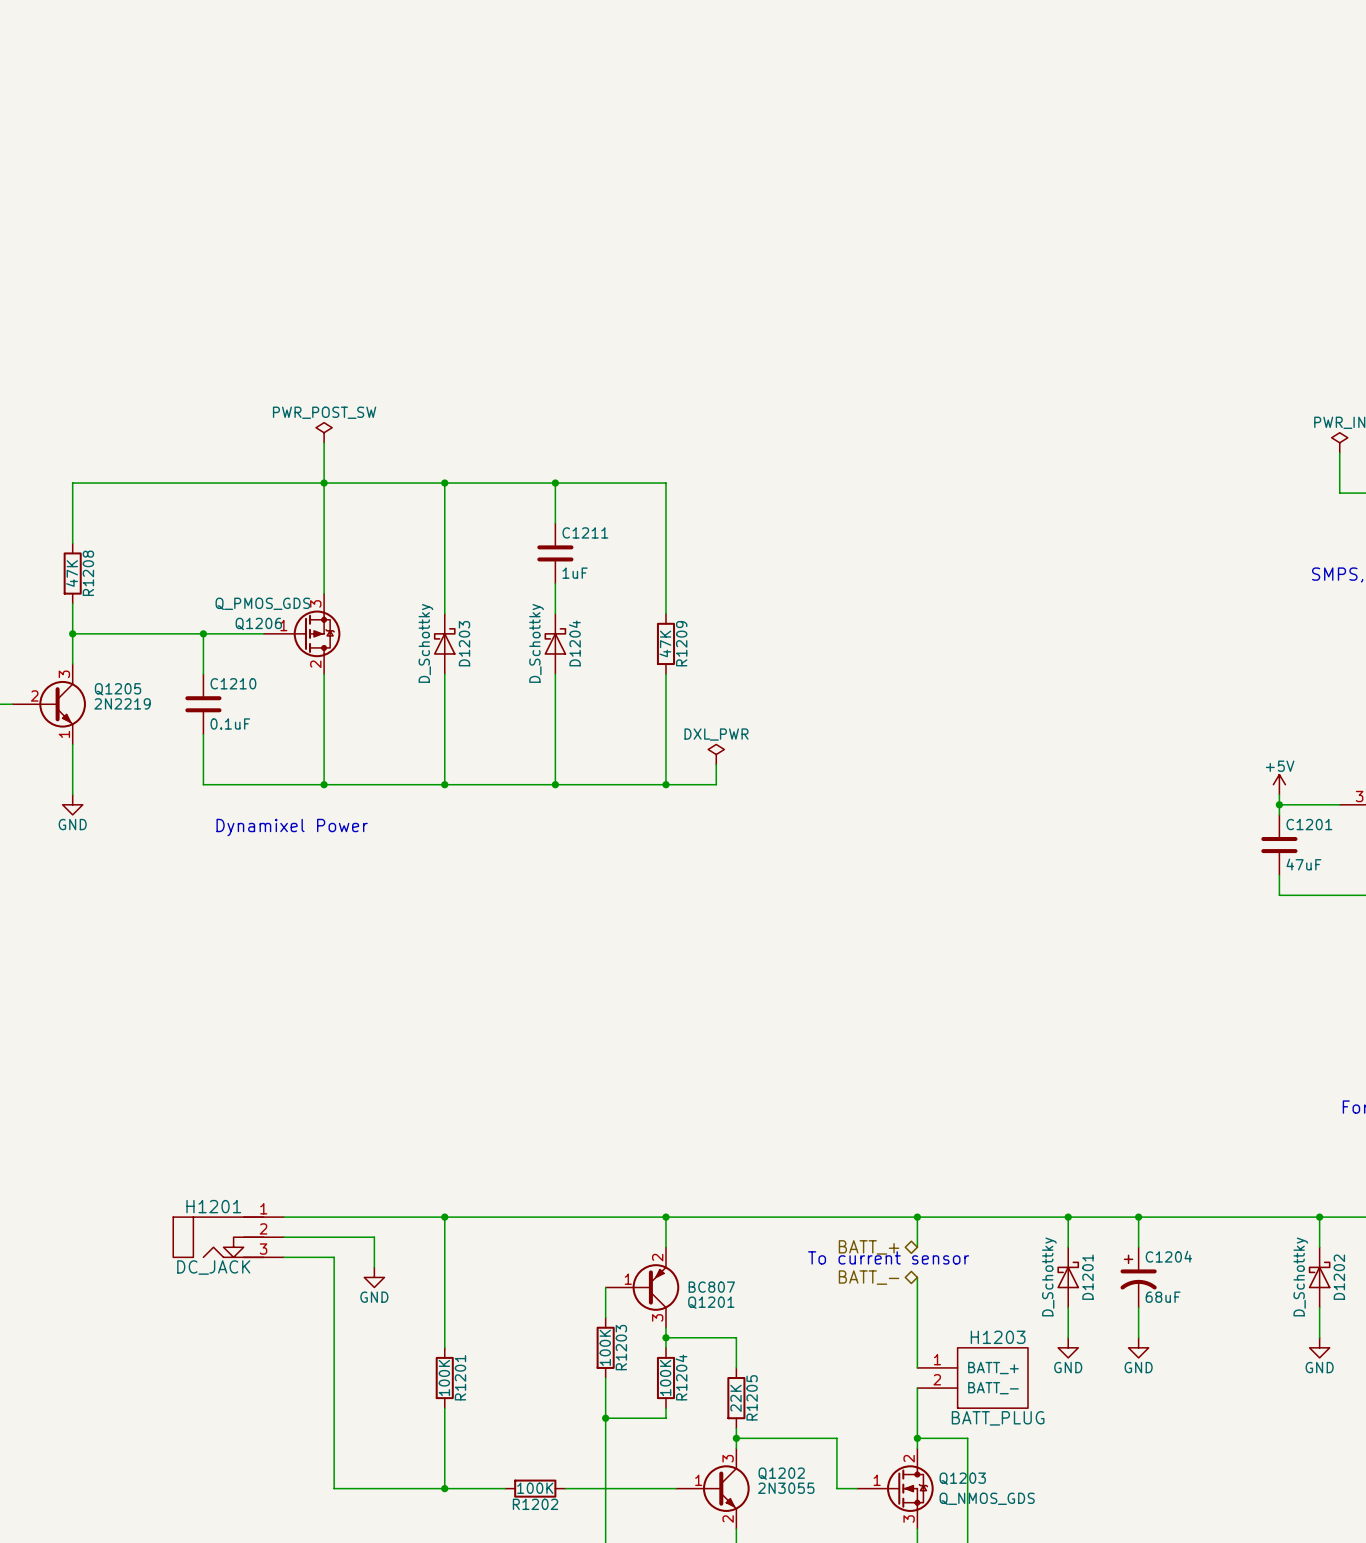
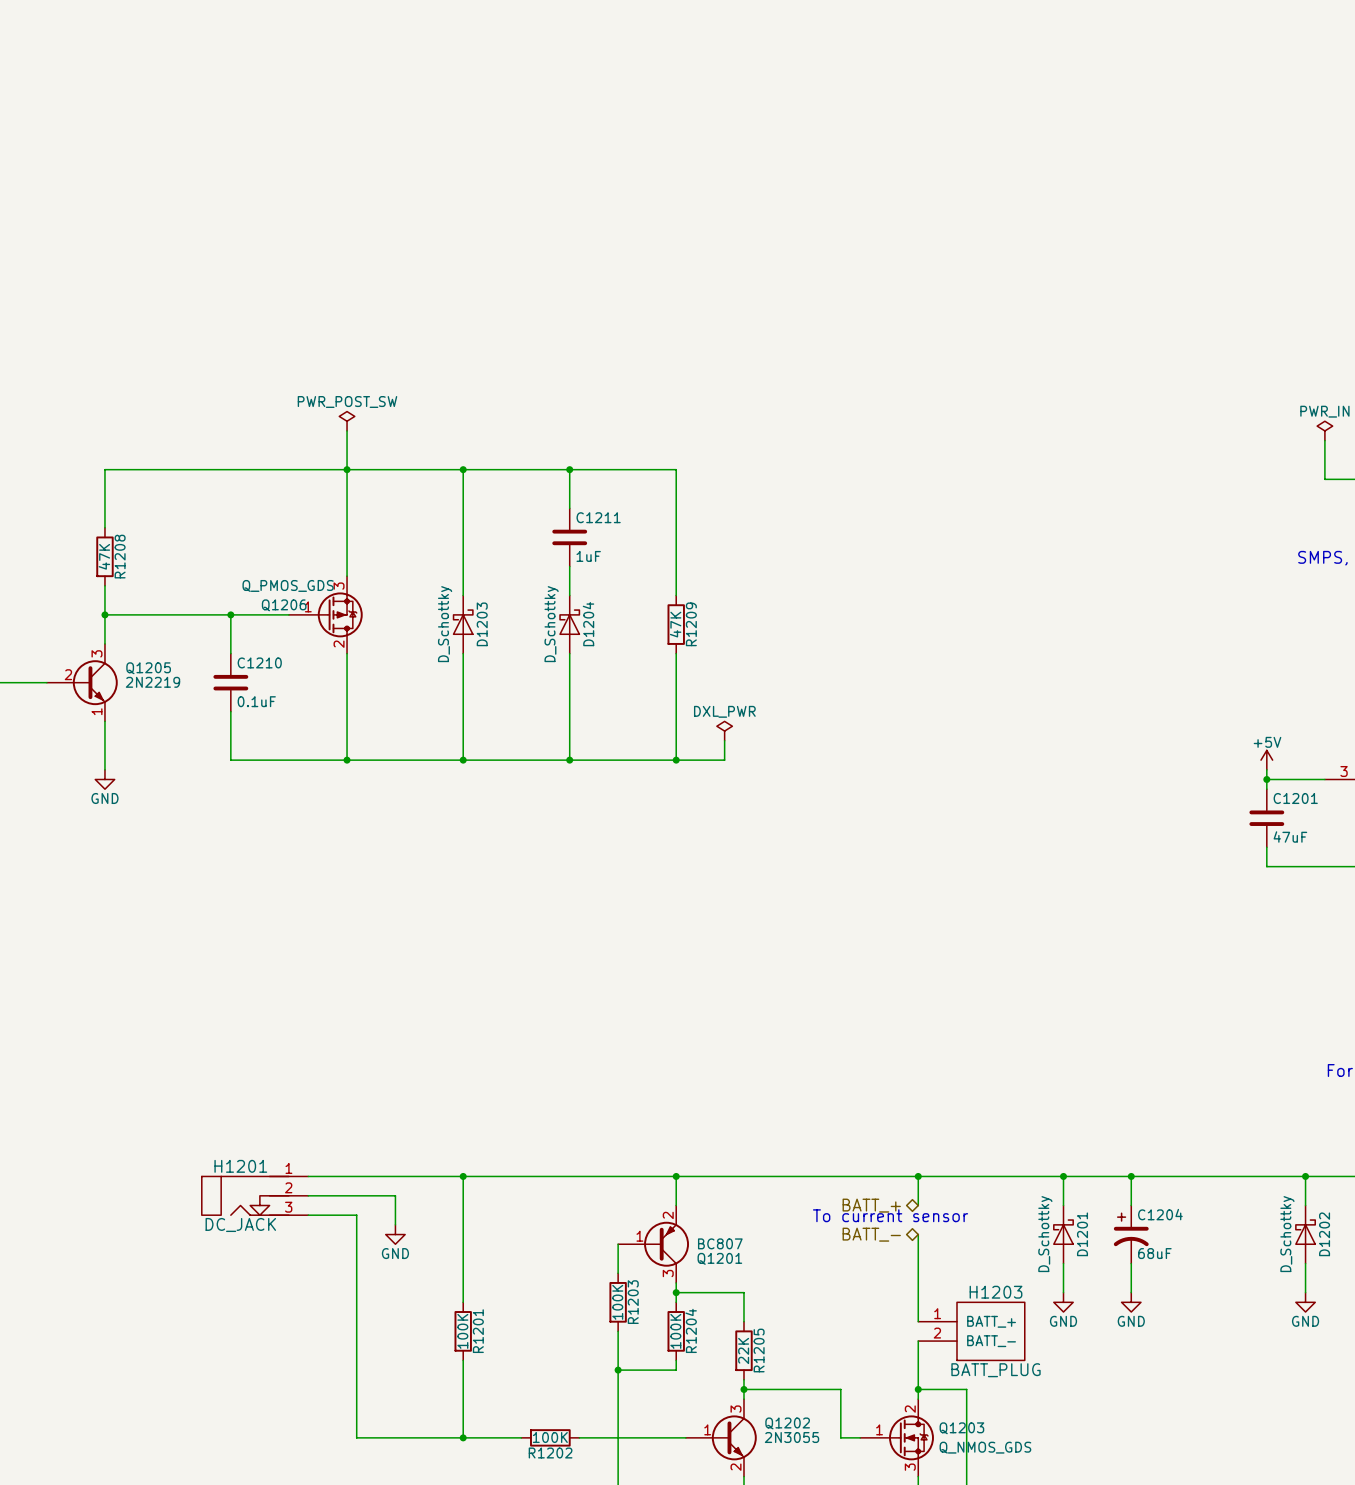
text: Dynamixel Power (292, 827) -> none

